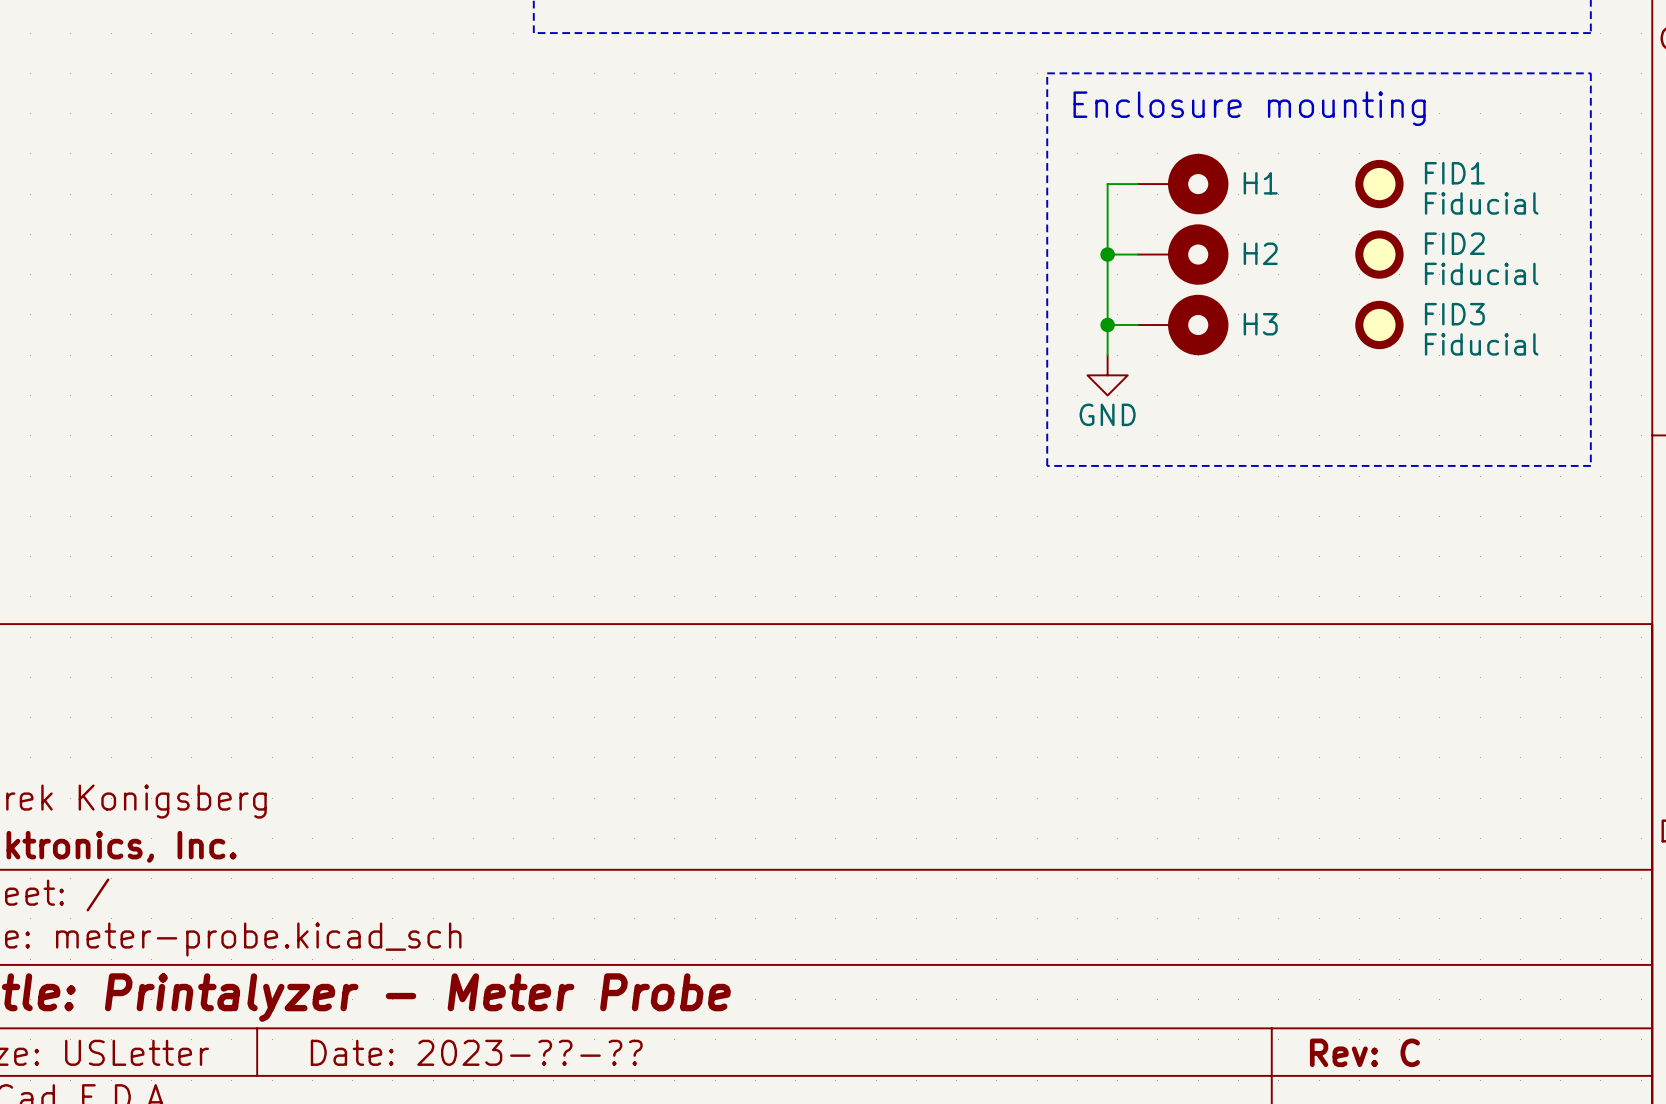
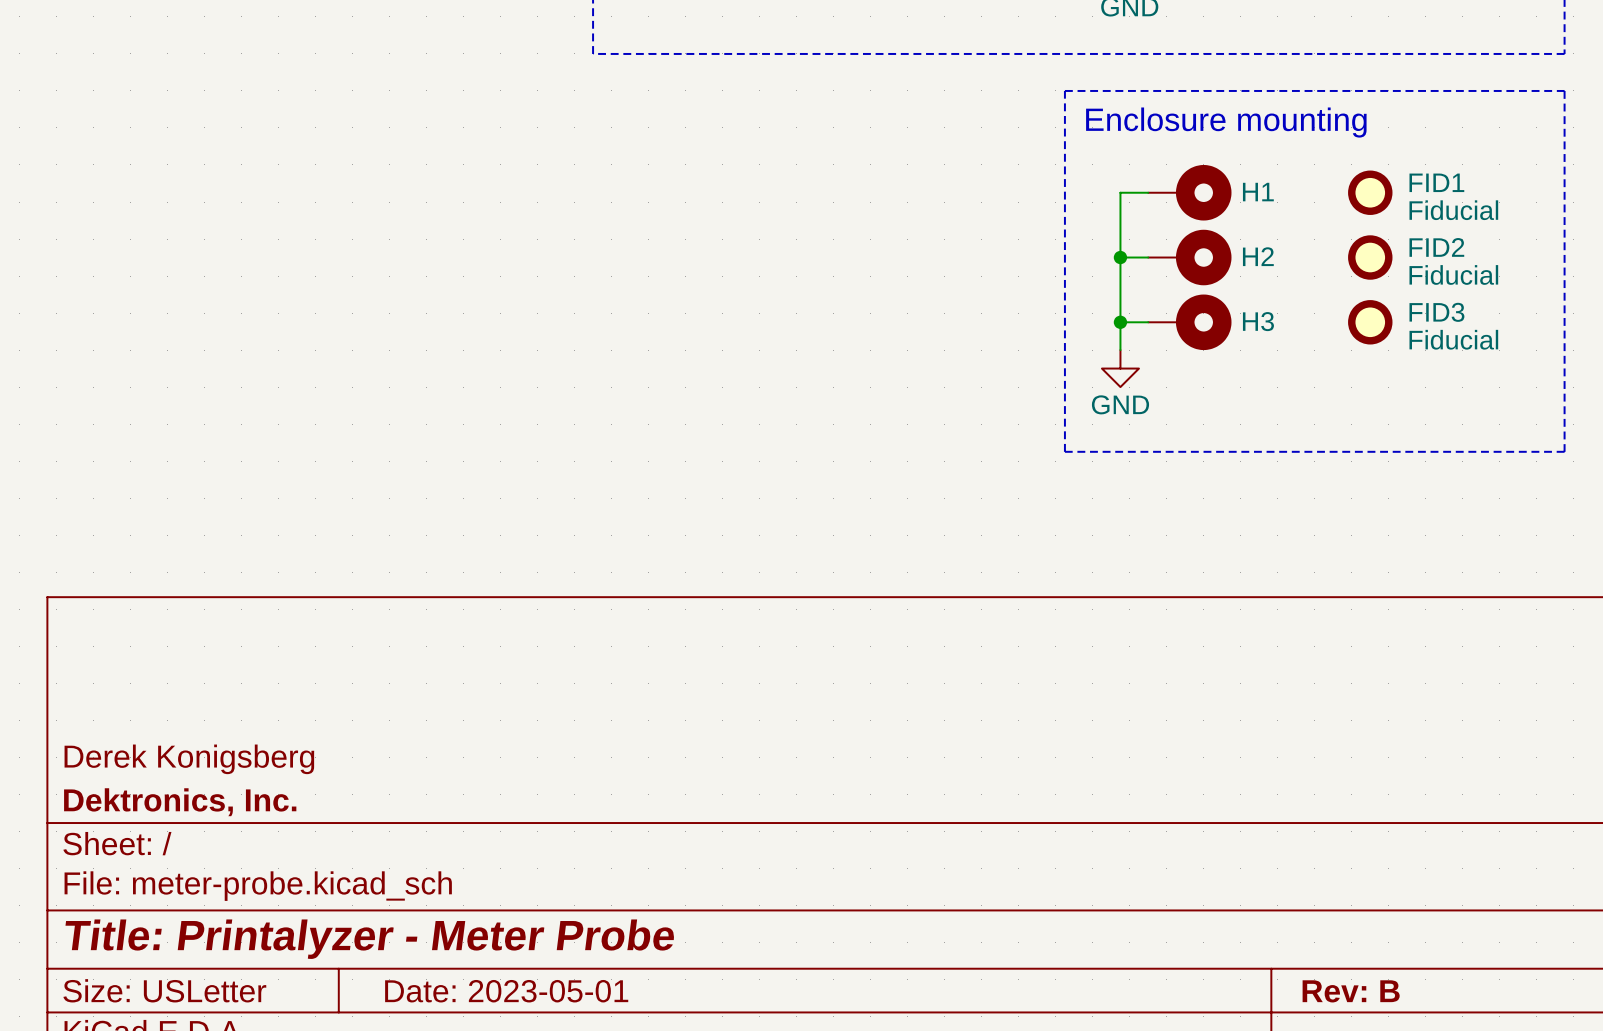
title block: Date: 2023-??-?? (476, 1052) -> Date: 2023-05-01 (506, 991)
title block: Rev: C (1364, 1052) -> Rev: B (1351, 991)

